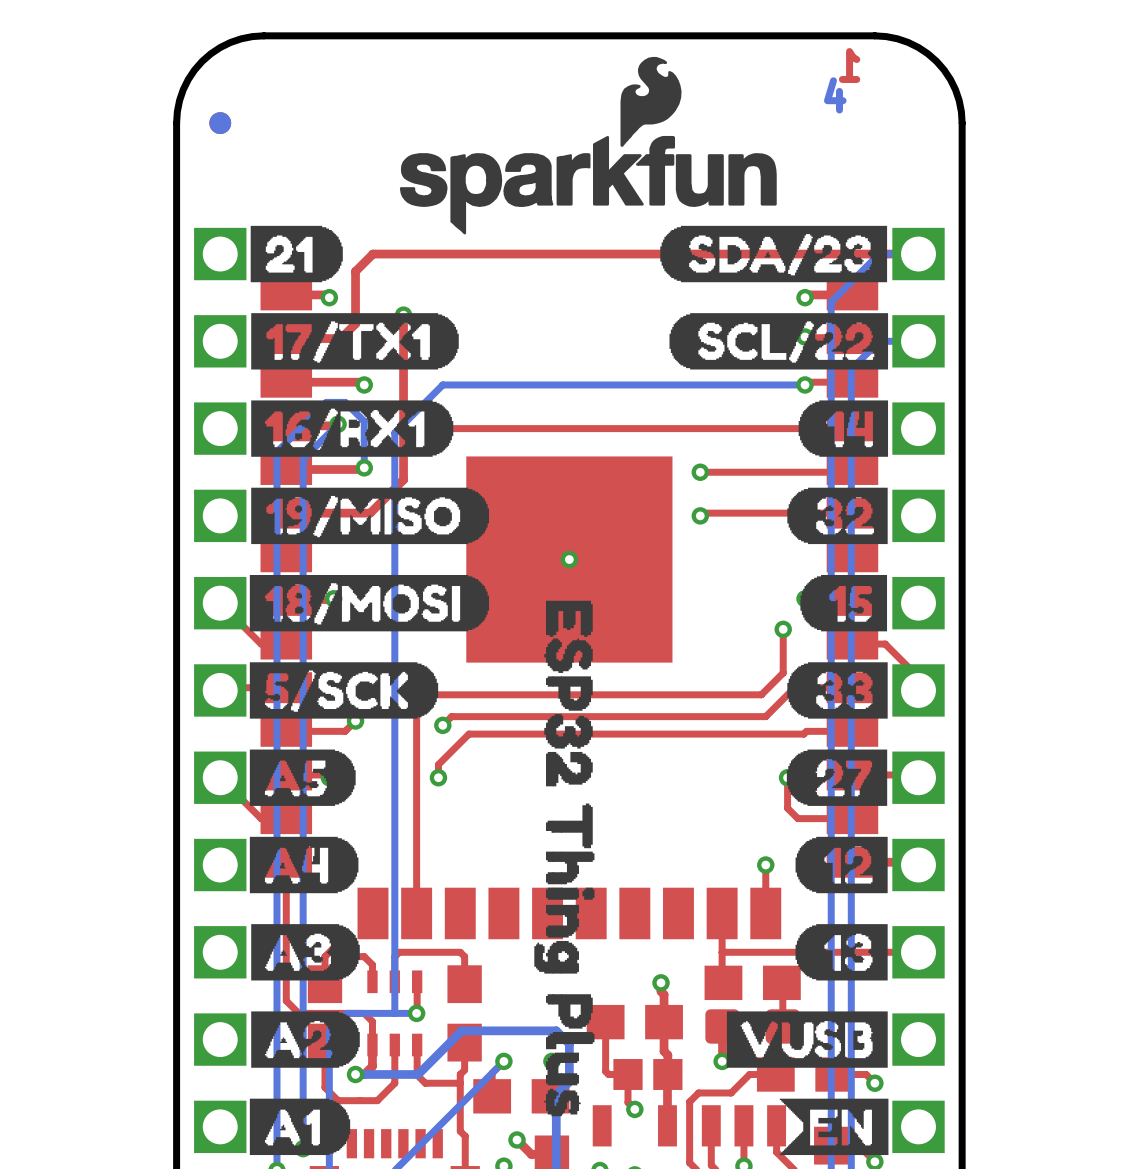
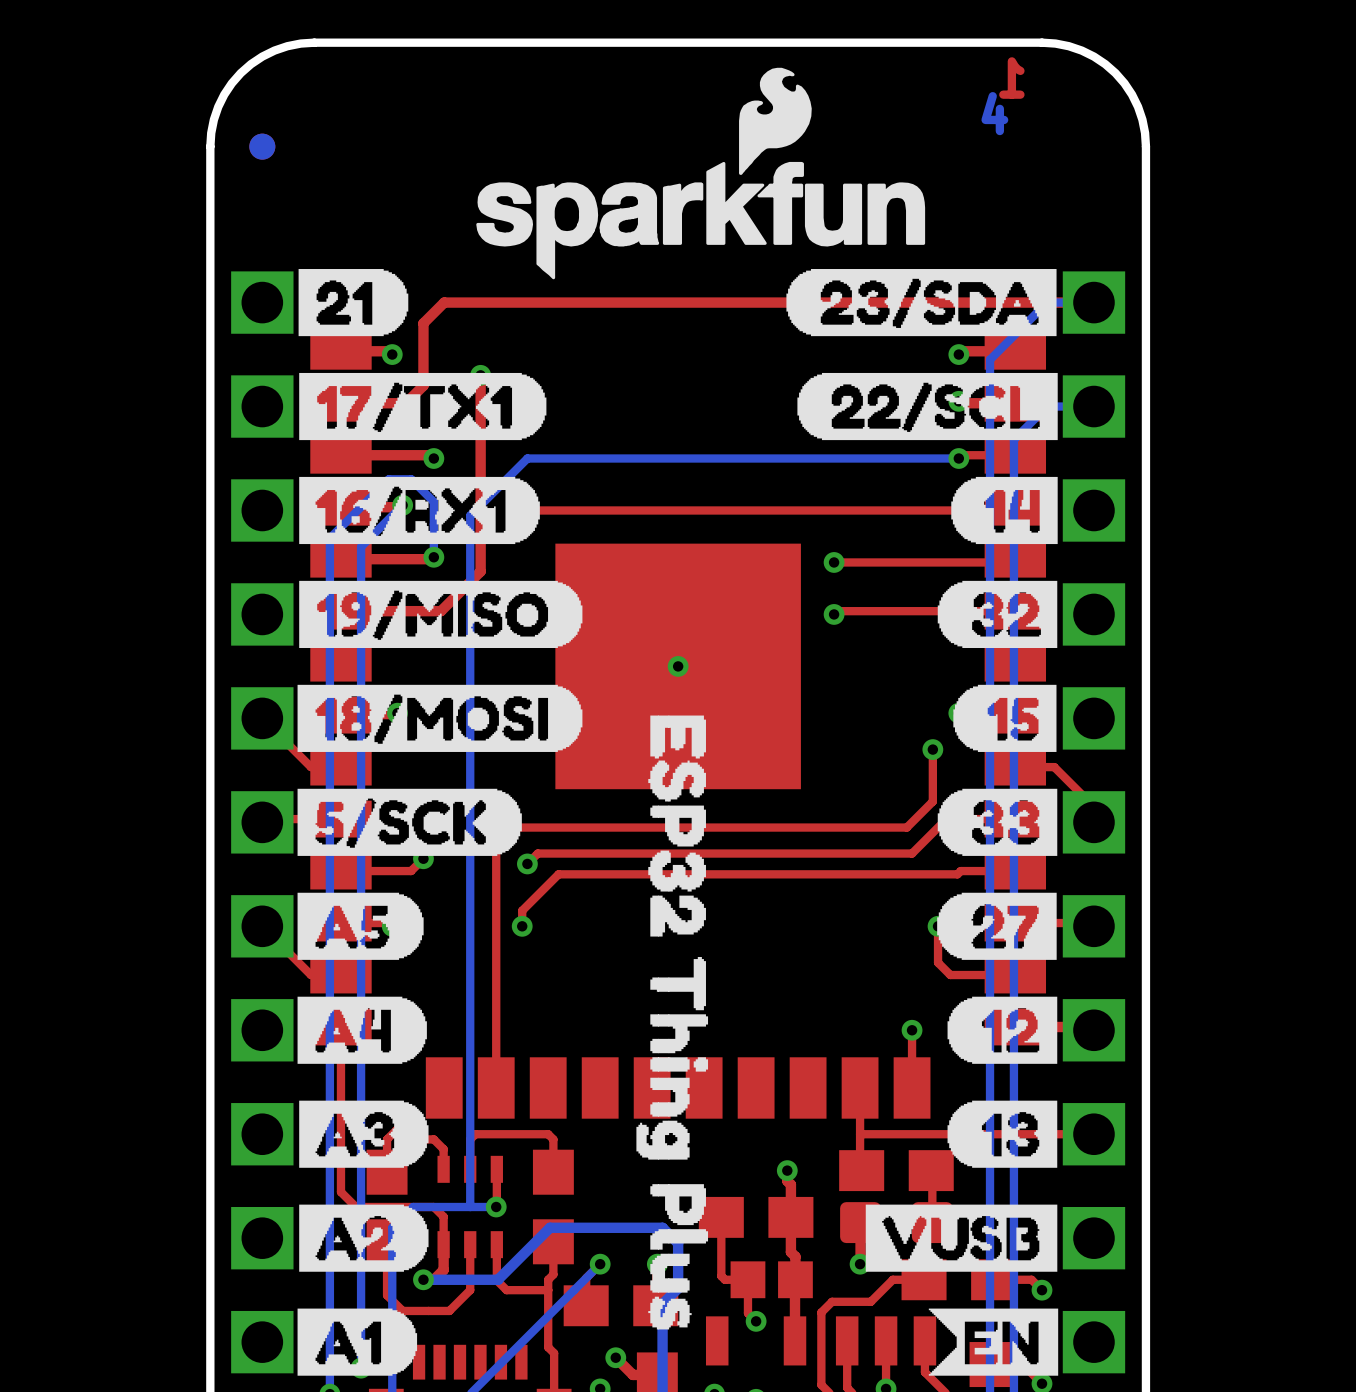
drawing shape: [660, 225, 888, 283] -> [786, 269, 1057, 337]
drawing shape: [669, 313, 889, 370] -> [797, 372, 1058, 441]

